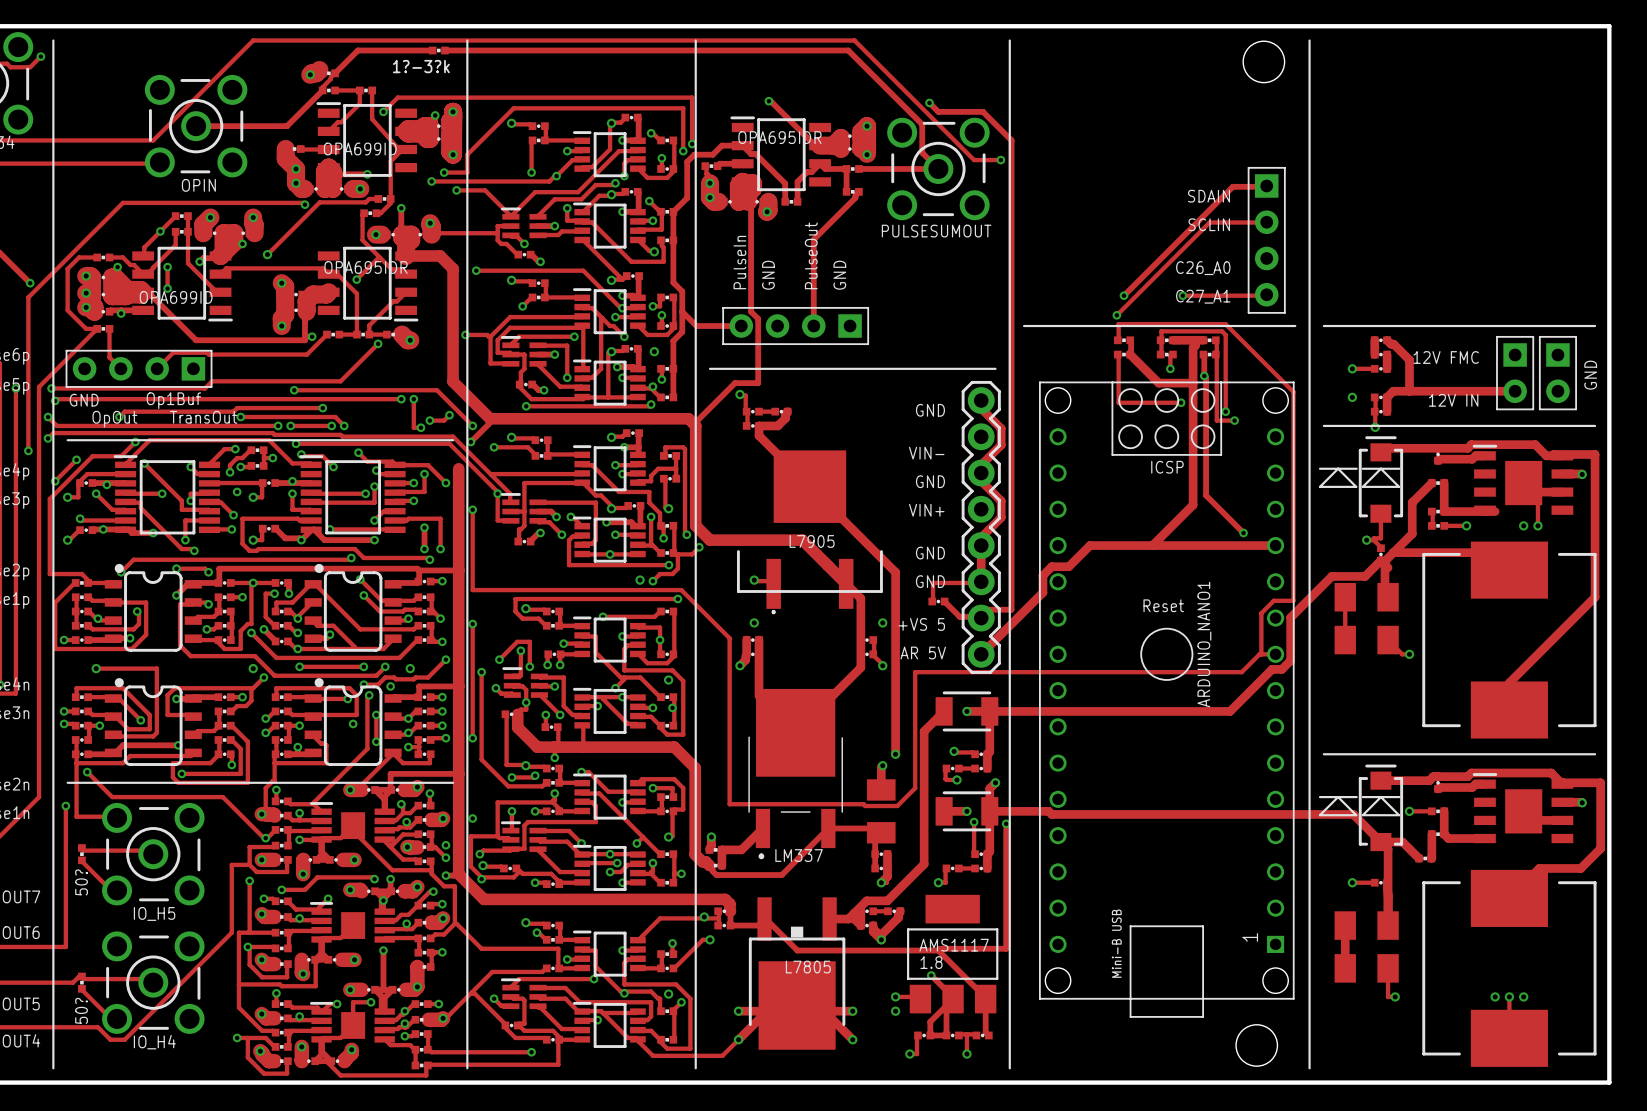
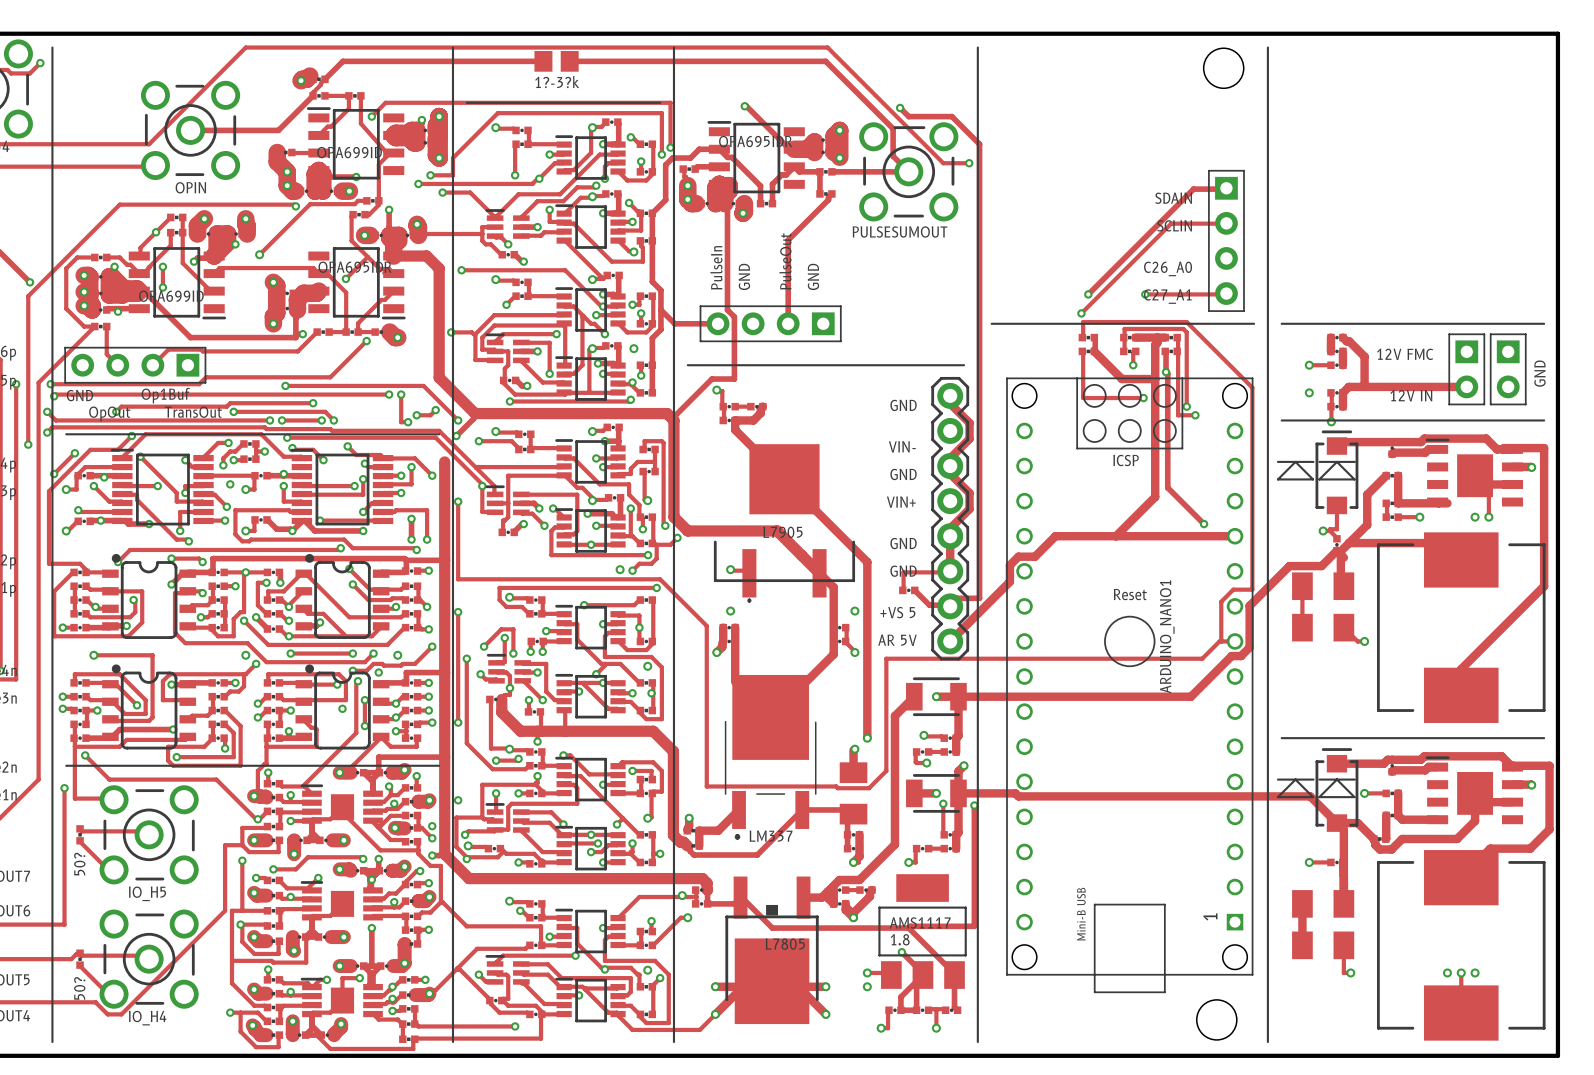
track: (432, 50) (357, 50) (353, 54) -> (543, 61) (342, 61)
part: 1?-3?k (438, 50) -> none
track: (444, 50) (848, 50) (852, 54) -> (569, 61) (825, 61)
part: none -> 1?-3?k (556, 61)
line: none -> (466, 102) (660, 102)
track: none -> (1475, 793) (1475, 821) (1457, 838) (1402, 838) (1391, 849) (1379, 849) (1375, 844) (1373, 838)

